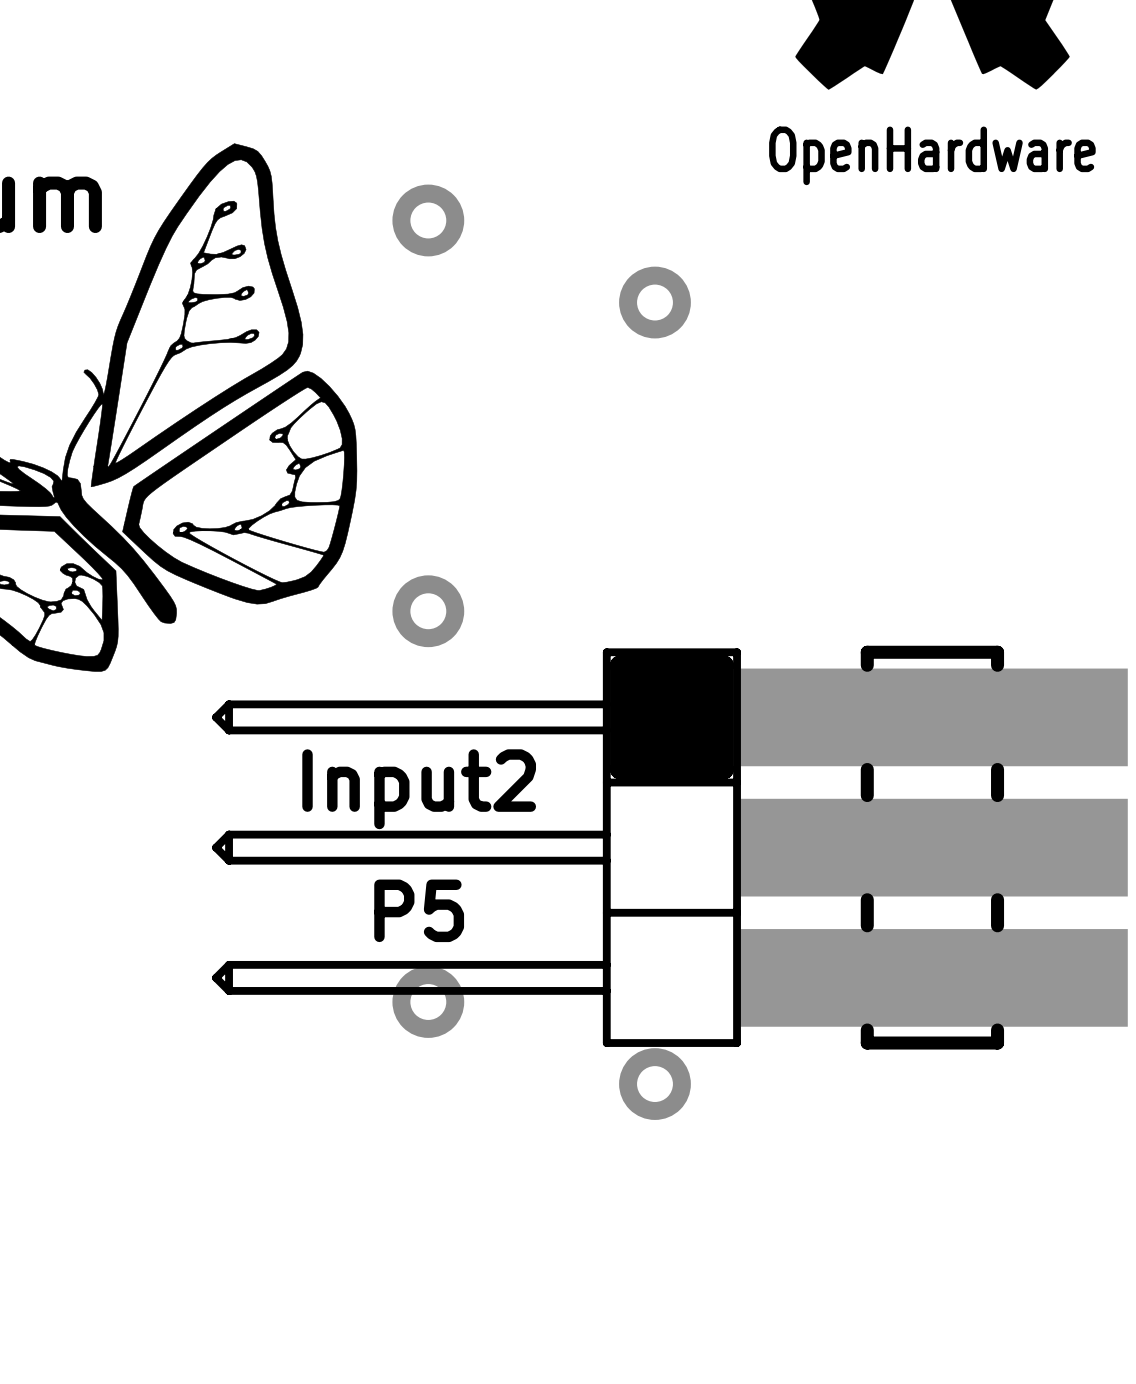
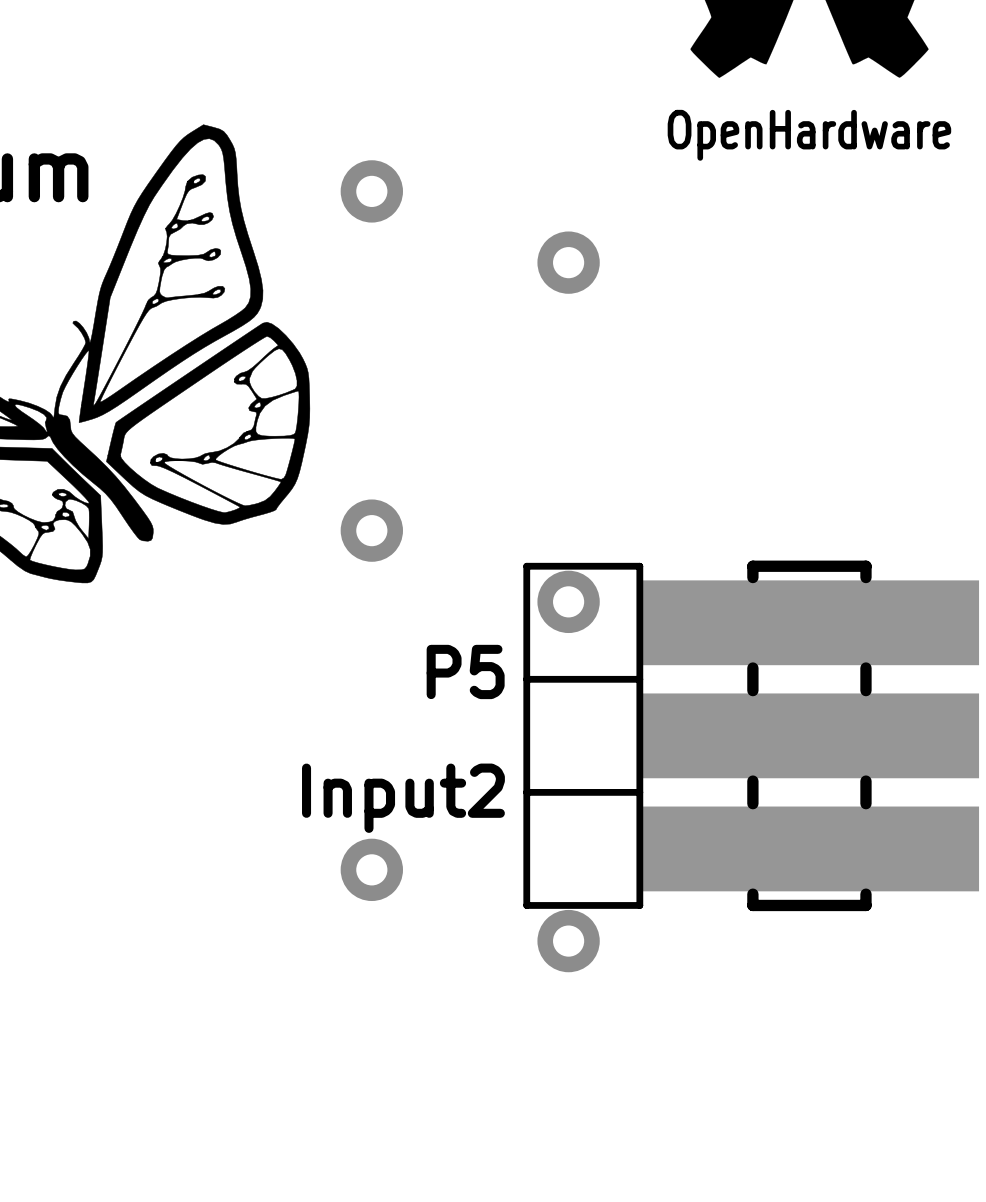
P5 footprint: [212, 645, 1128, 1050] -> [523, 560, 980, 912]
P5 value position: Input2 (419, 789) -> Input2 (403, 798)
P5 name position: P5 (419, 910) -> P5 (465, 671)

